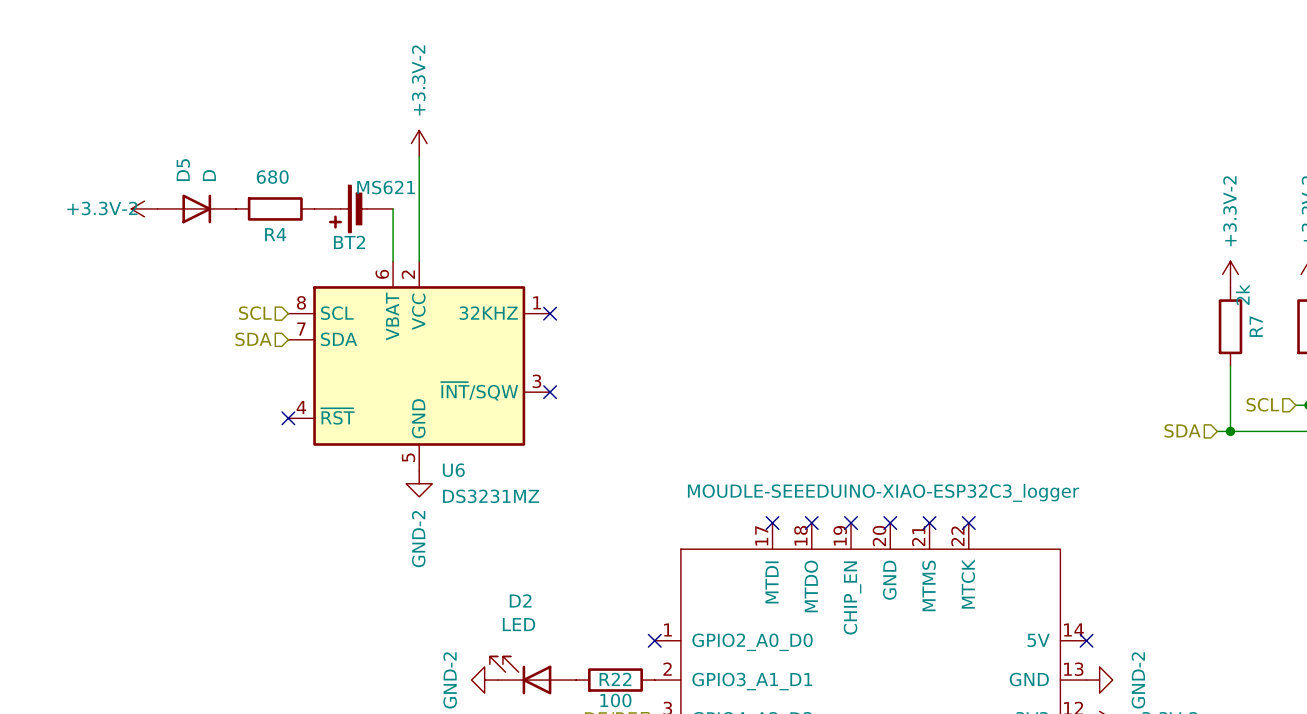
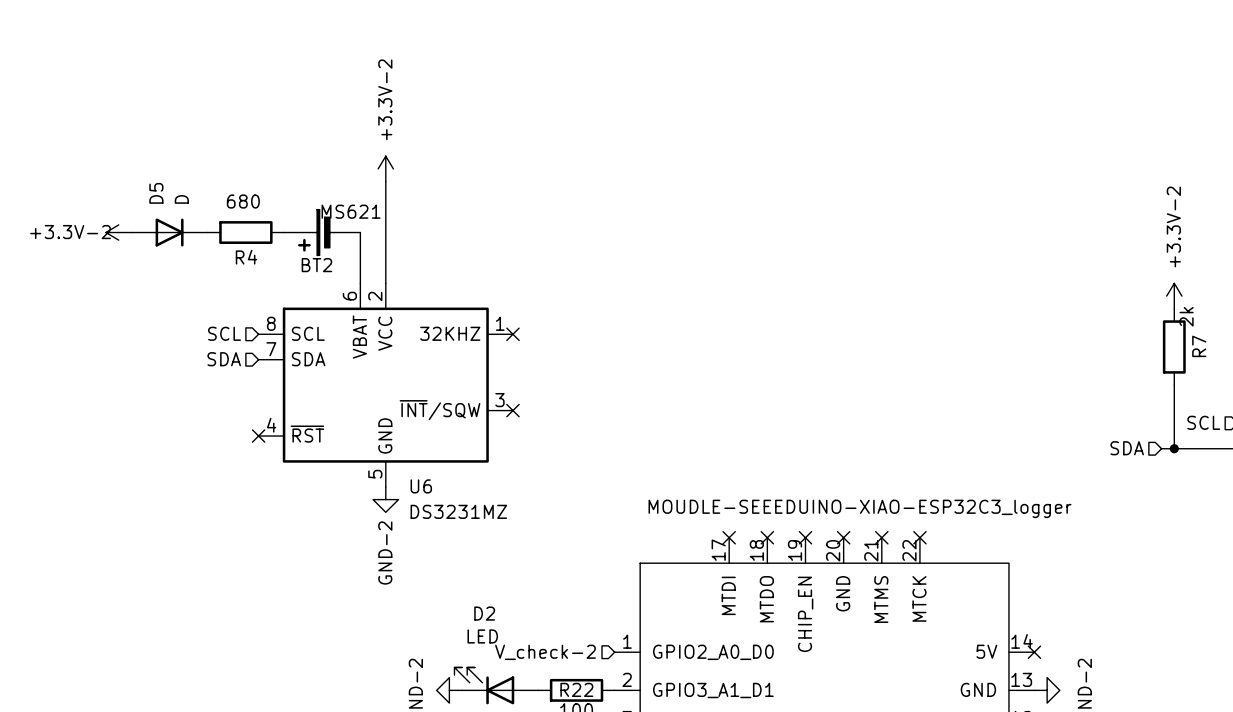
no-connect mark: (654, 640) -> none
hierarchical label: none -> V_check-2 (545, 652)

